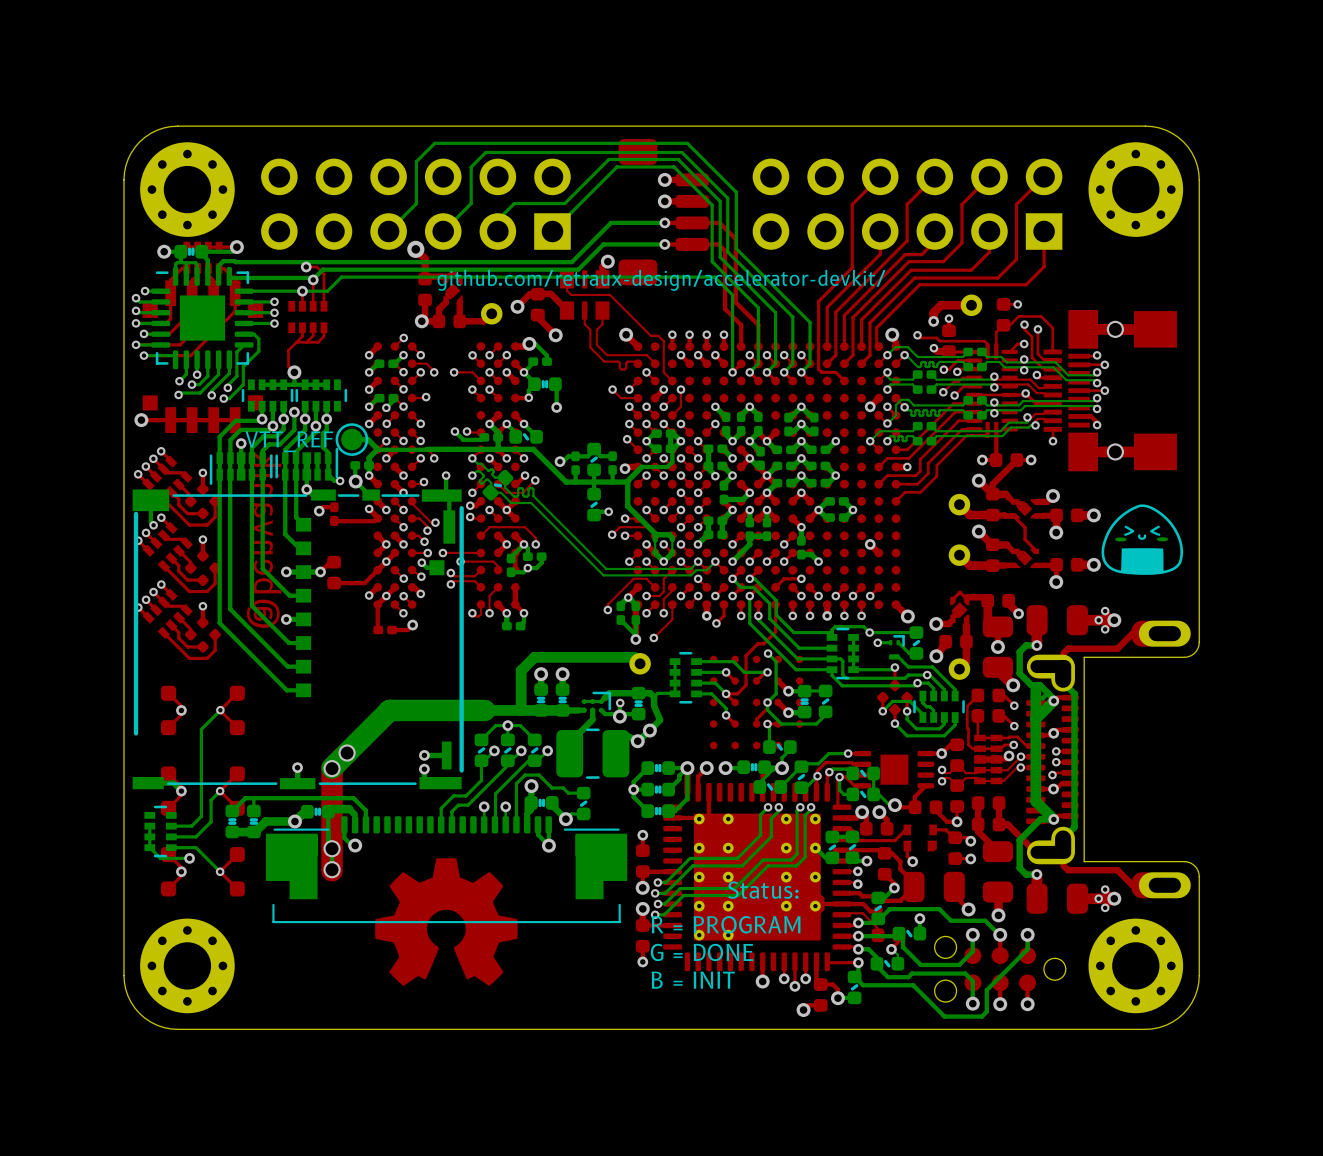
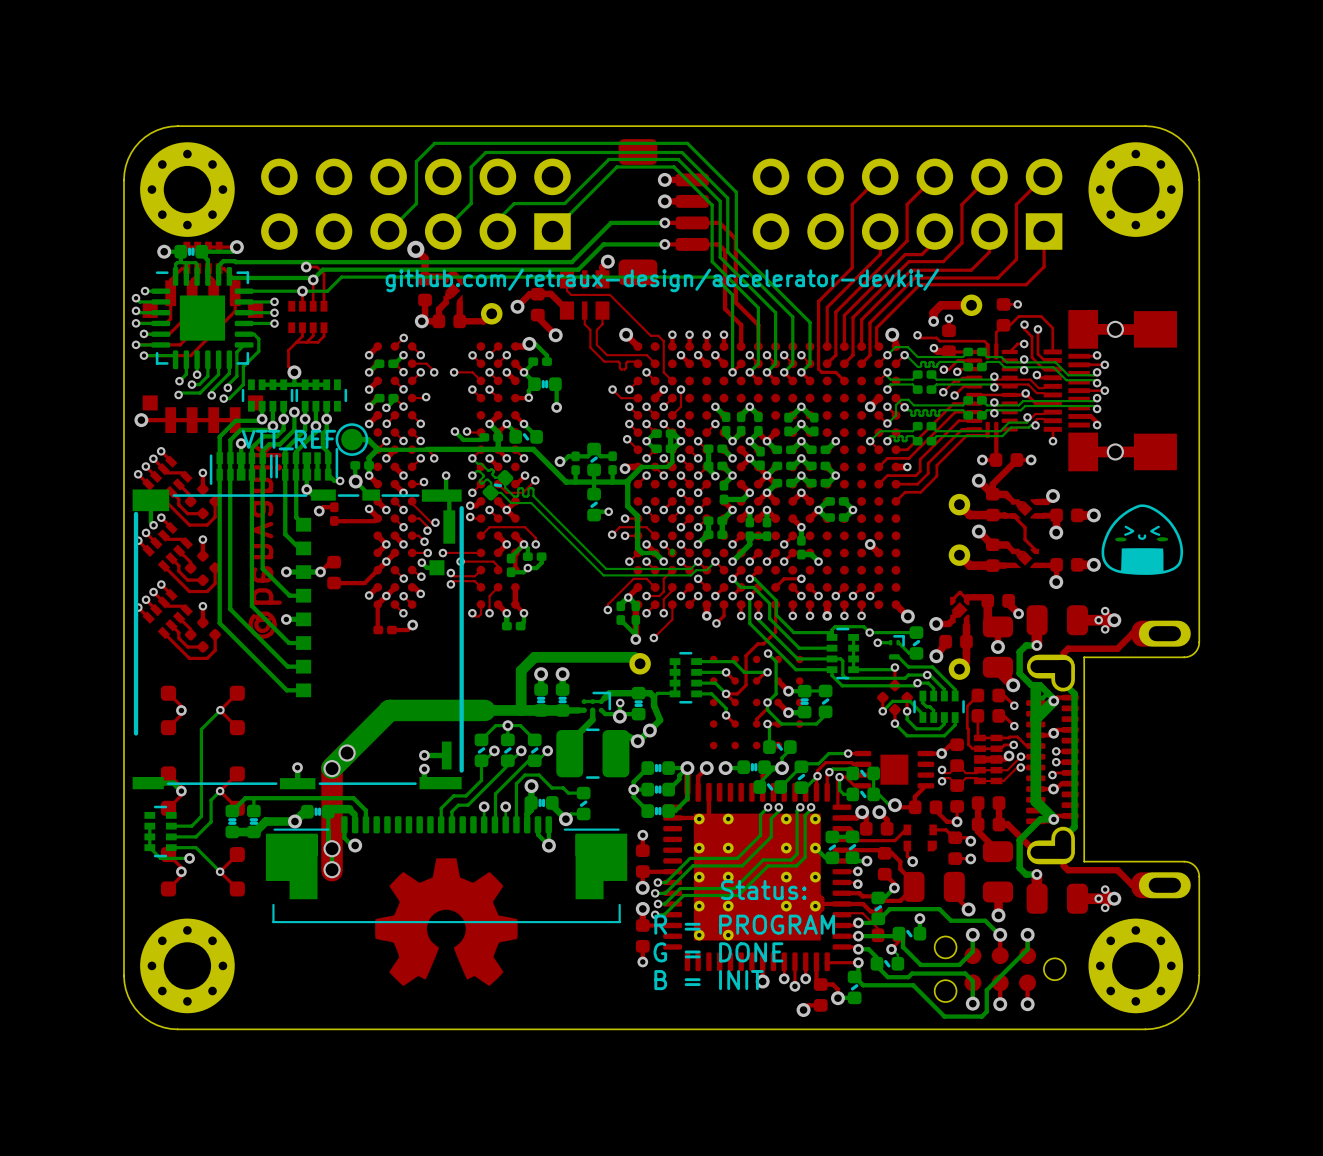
bottom track: (637, 516) (656, 534) (669, 534) (672, 537) (672, 553) (663, 561) -> (637, 516) (637, 548) (642, 553) (655, 553)
bottom track: (655, 533) (655, 540) (655, 553) (655, 551) -> none

